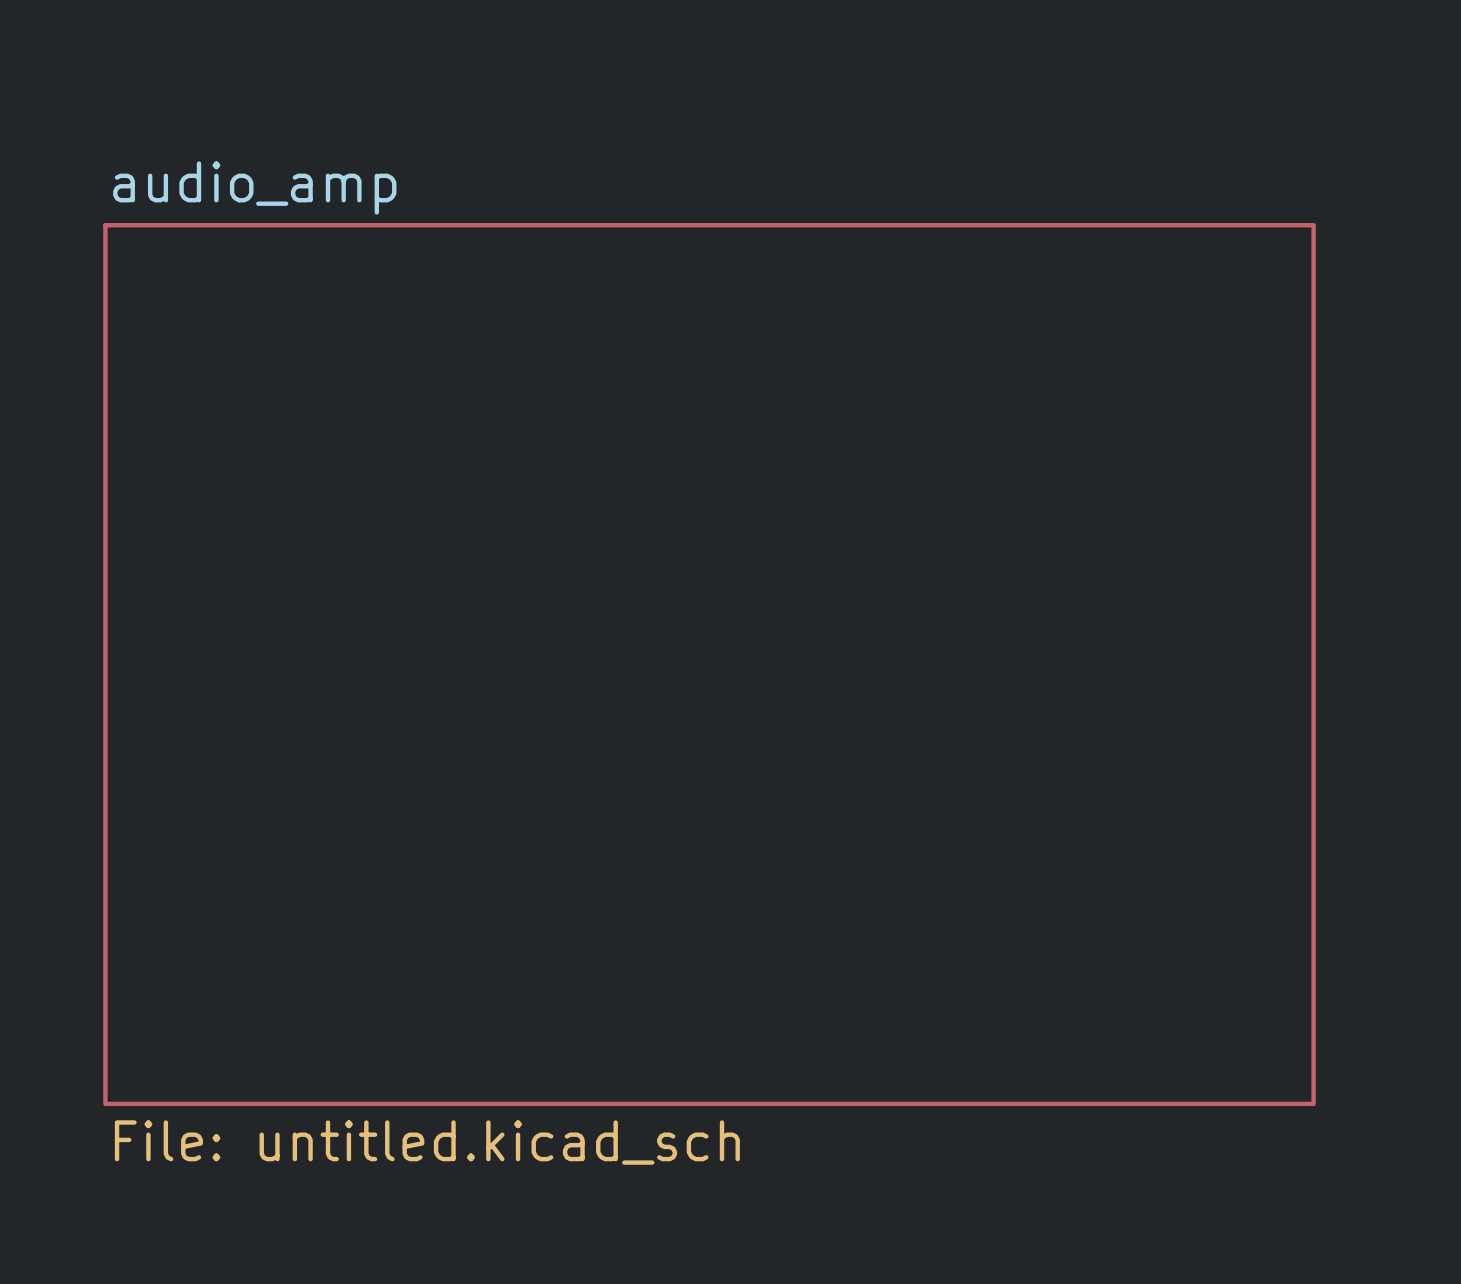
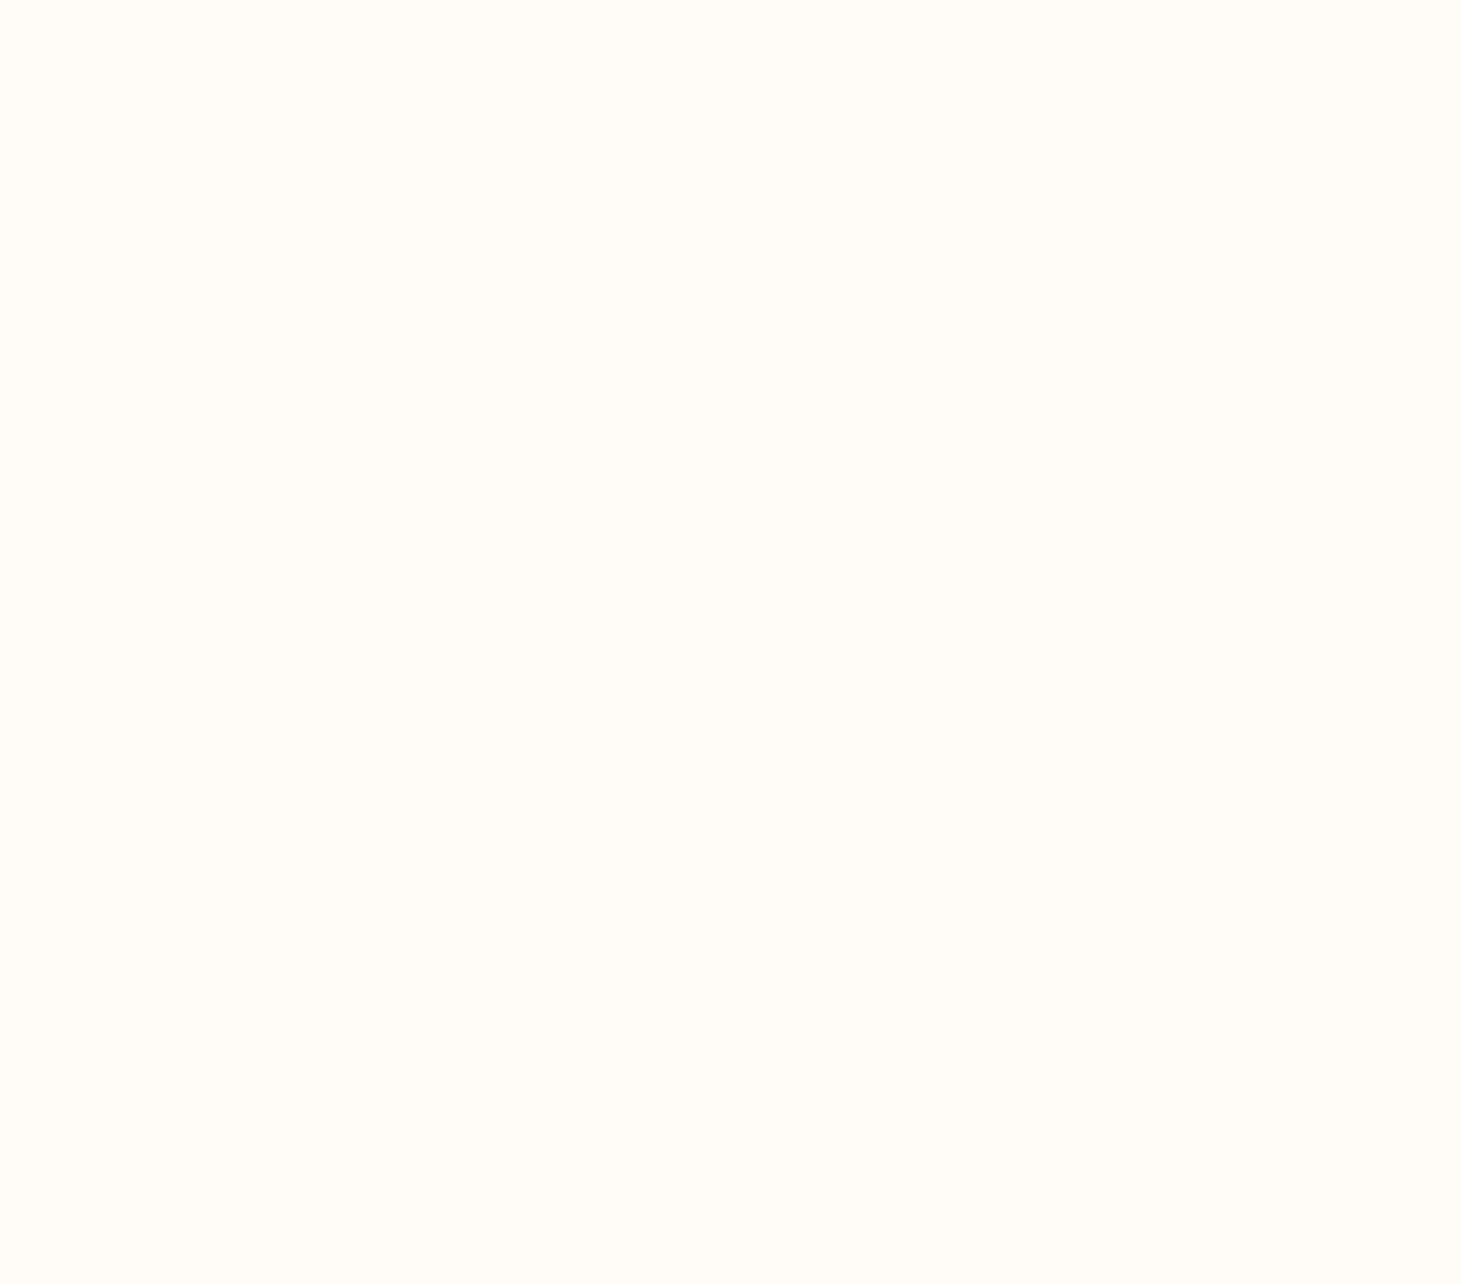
sheet audio_amp: File: untitled.kicad_sch (709, 664) -> none

